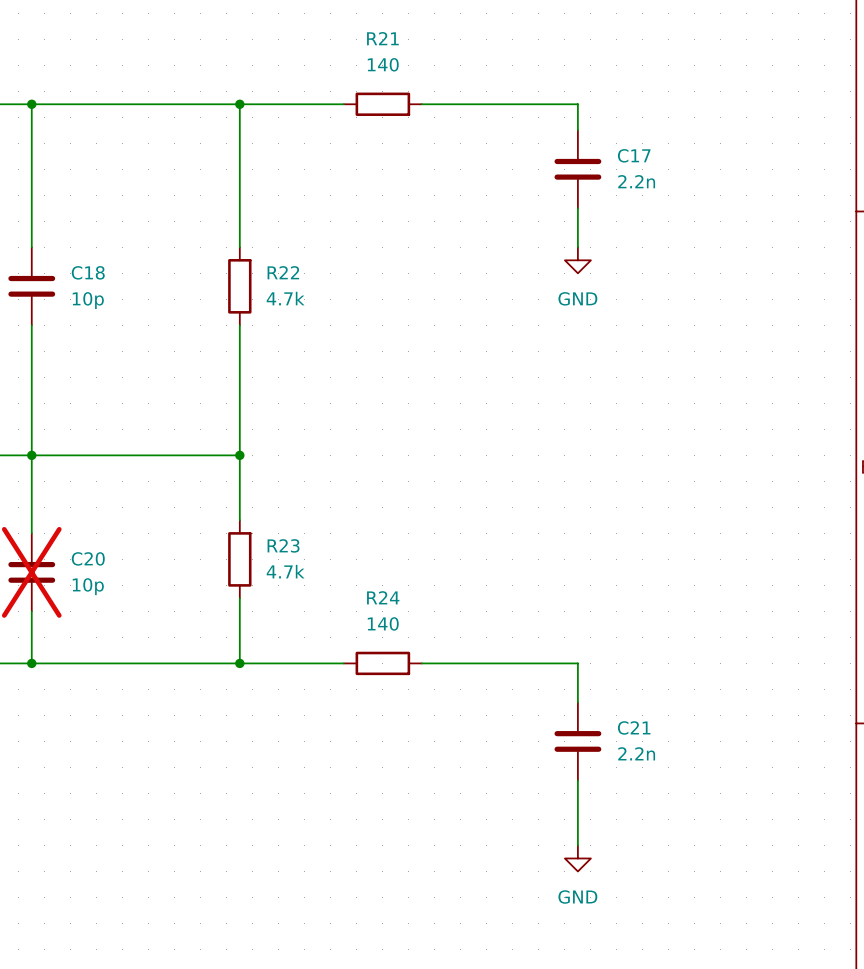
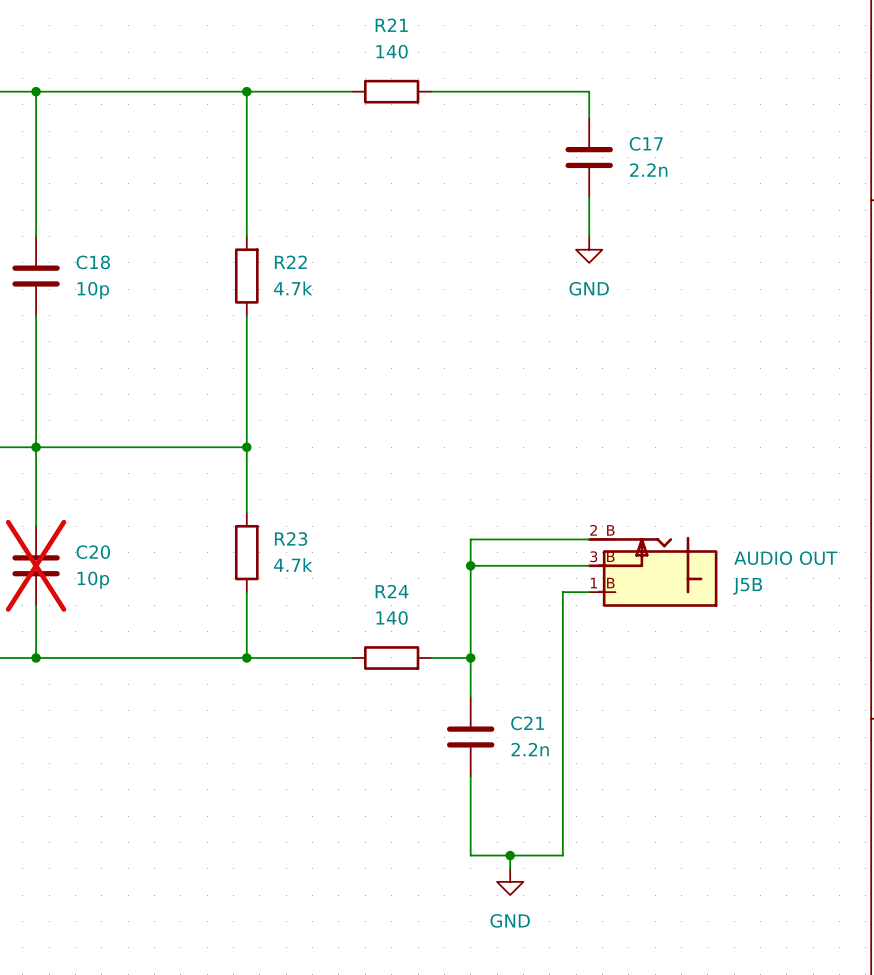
wire: none -> (589, 539) (470, 539) (470, 697)
wire: none -> (470, 565) (589, 565)
junction: none -> (470, 565)
J5B: none -> AUDIO OUT (652, 571)
wire: none -> (589, 592) (562, 592) (562, 855) (470, 855) (470, 776)
wire: (460, 663) (577, 663) (577, 702) -> none
junction: none -> (470, 657)
C21 position: (577, 741) -> (470, 737)
wire: (577, 780) (577, 845) -> none
wire: none -> (510, 855) (510, 868)
junction: none -> (510, 855)
power symbol position: GND (577, 858) -> GND (510, 881)

